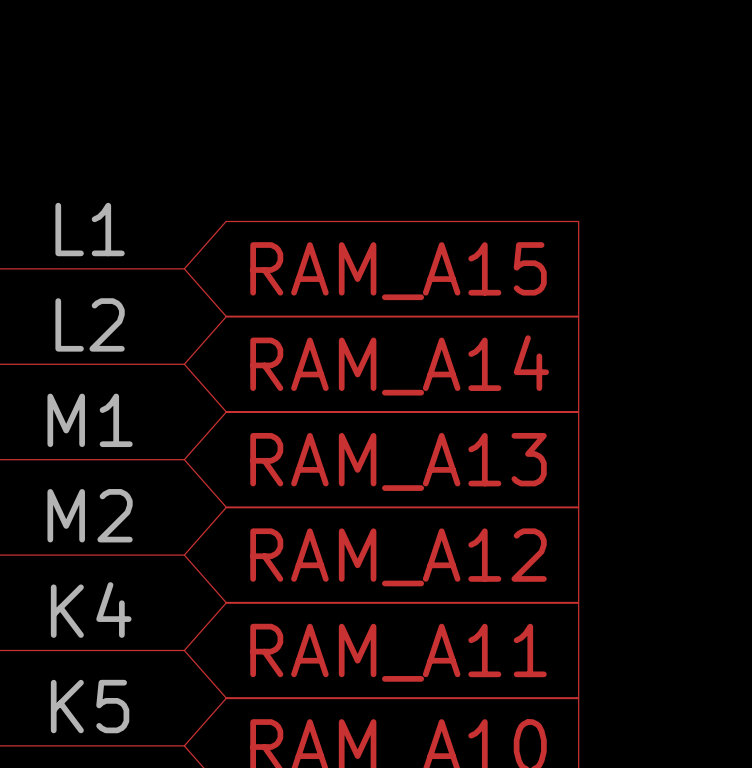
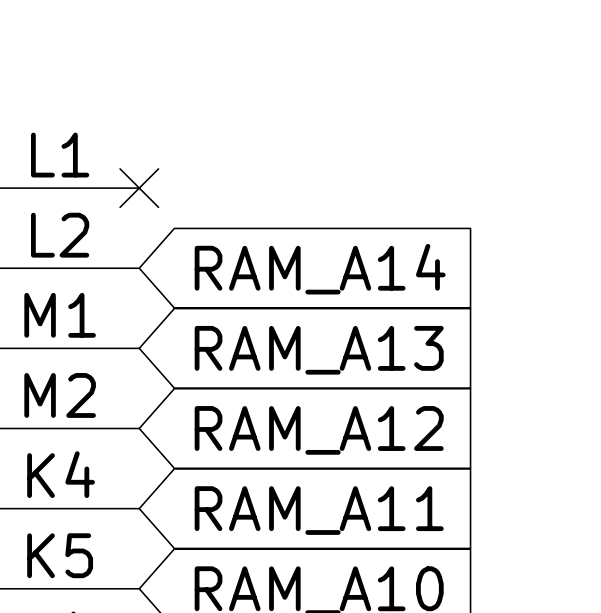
no-connect mark: none -> (139, 188)
global label: RAM_A15 (398, 271) -> none

